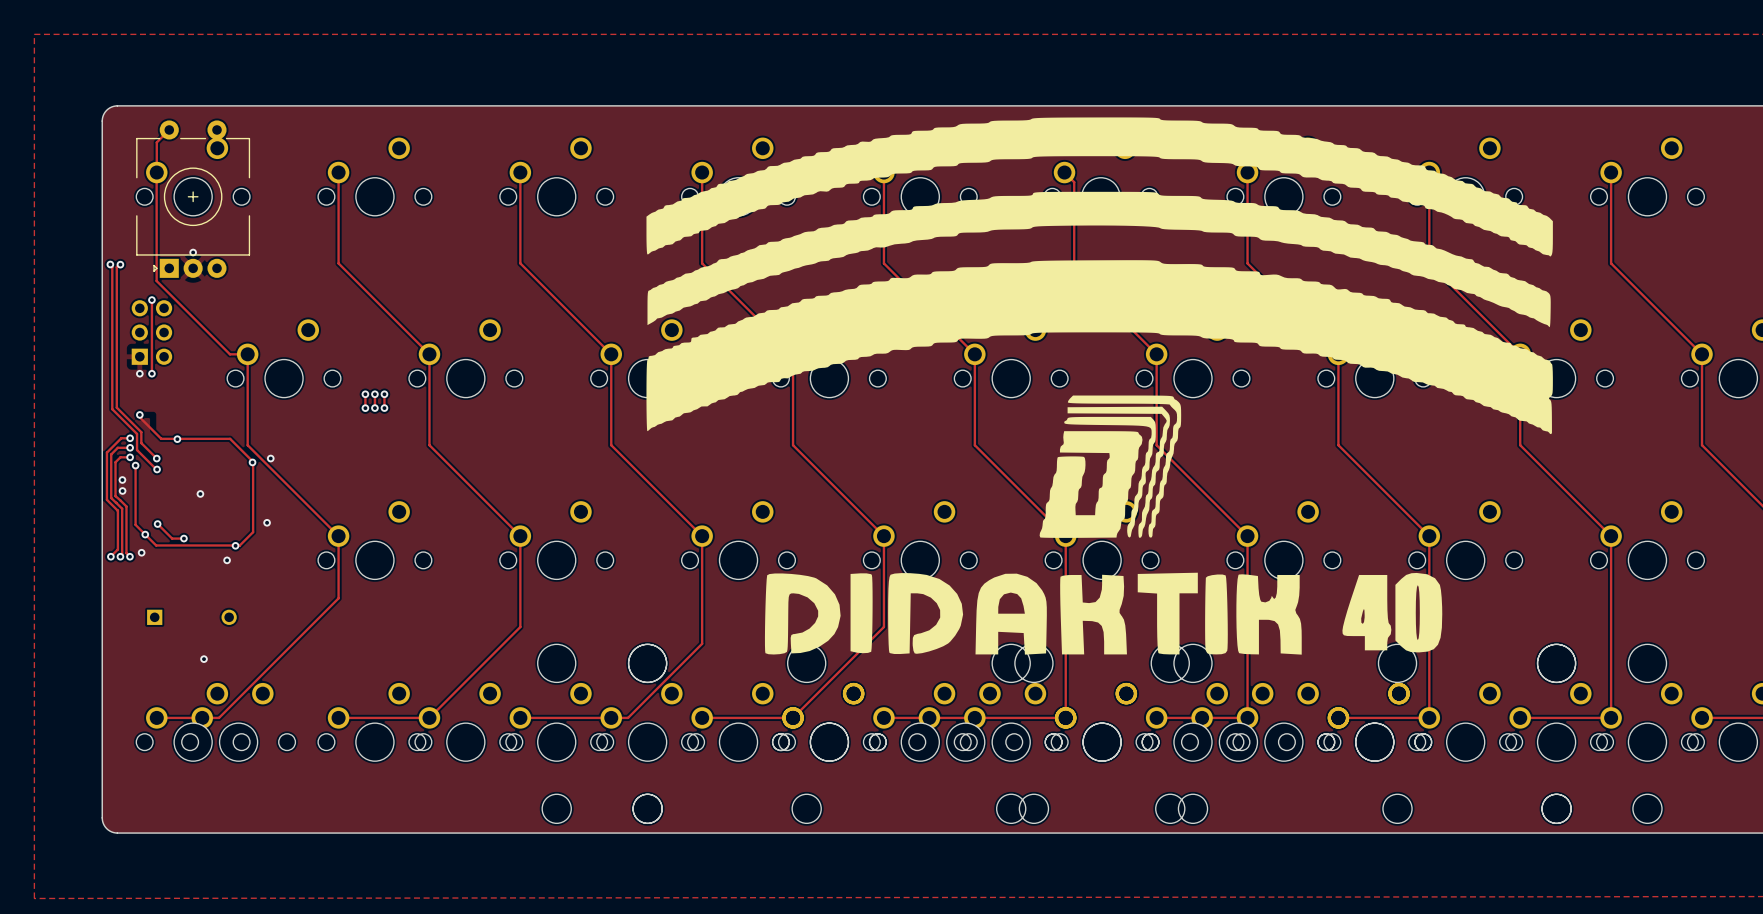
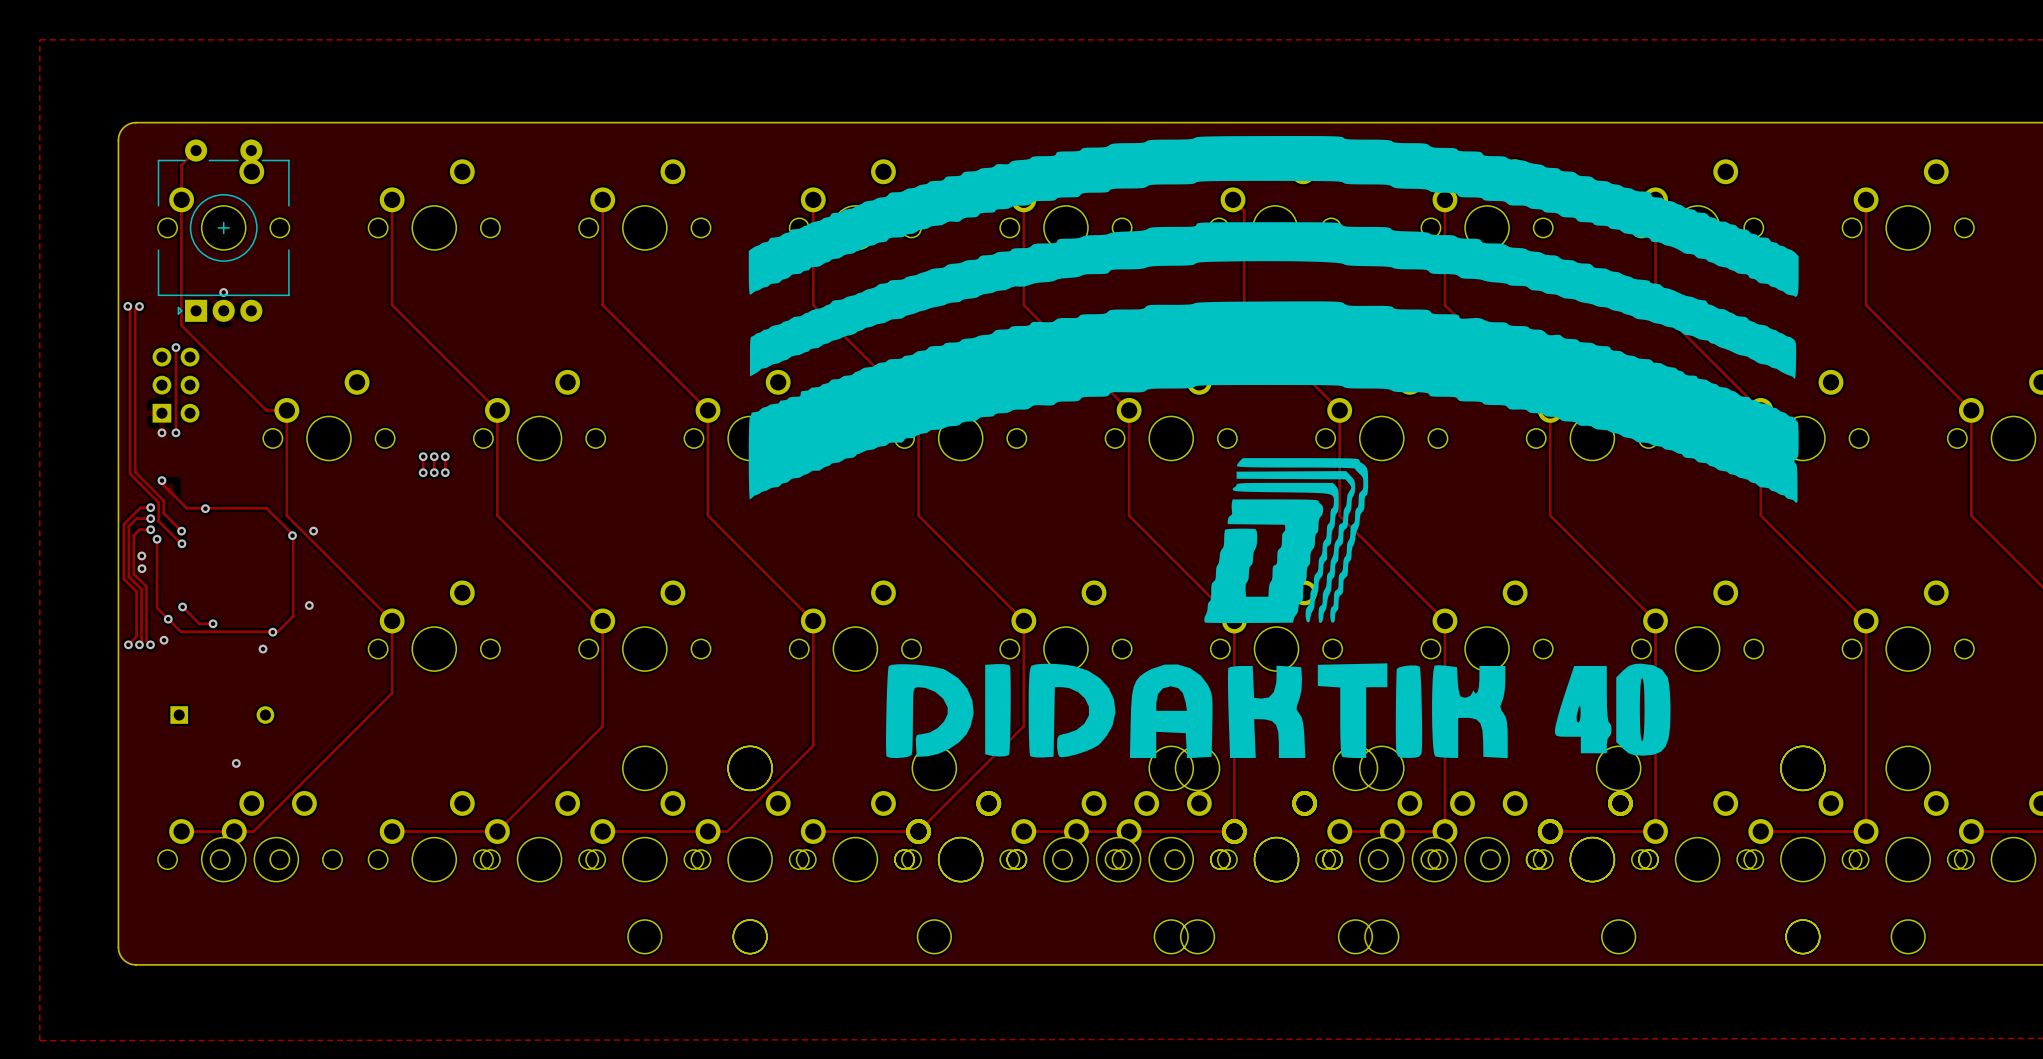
via: (200, 493) -> none

